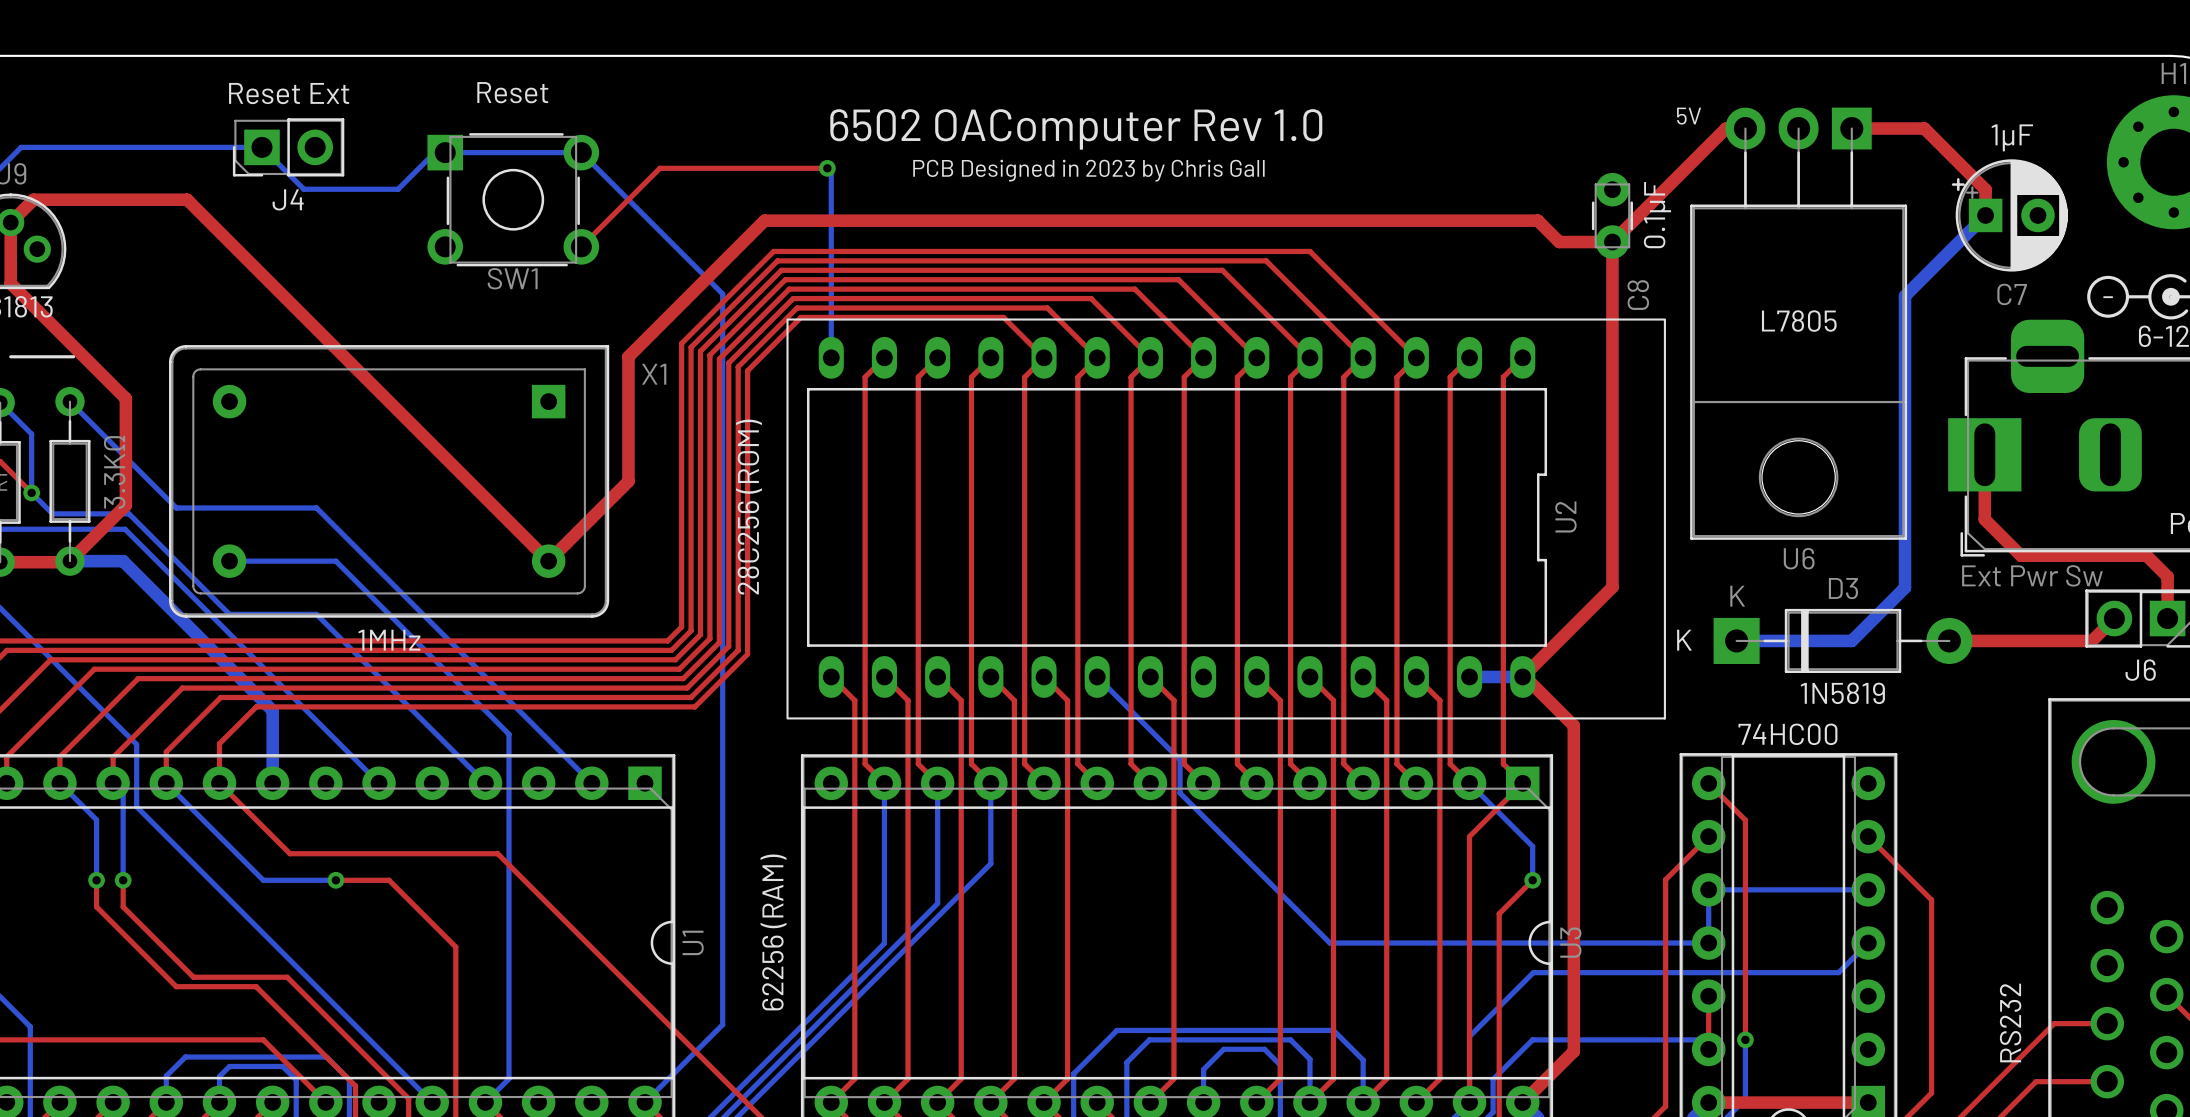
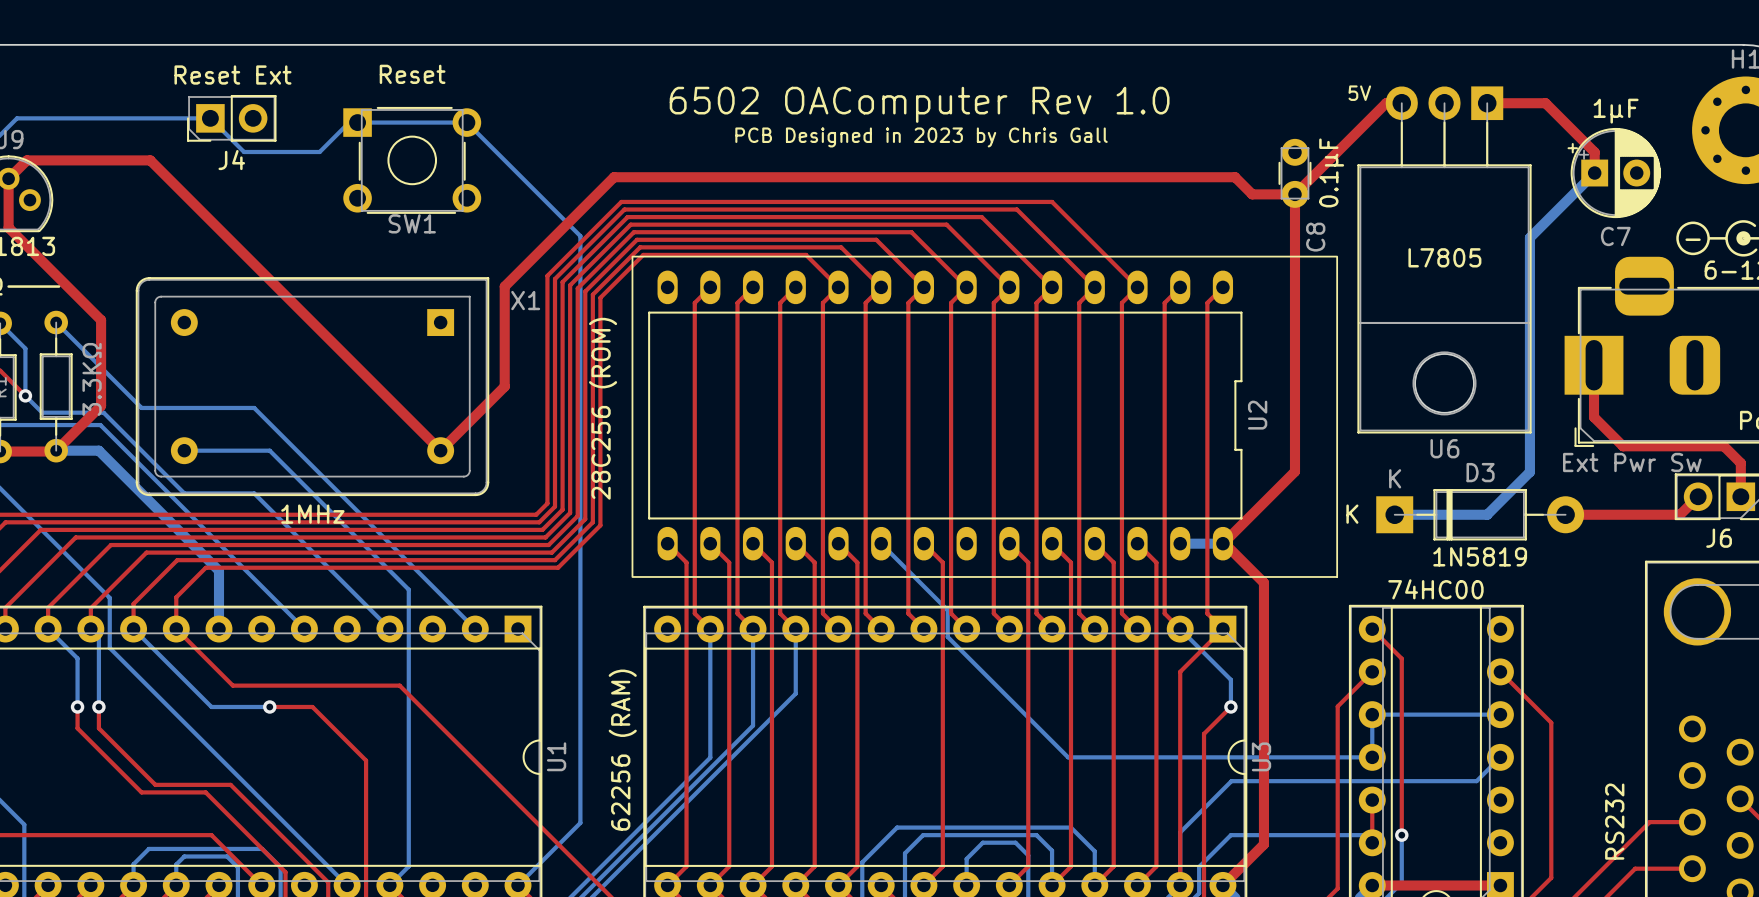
top track: (827, 168) (659, 168) (581, 246) -> none
bottom track: (827, 168) (831, 172) (831, 339) -> none
via: (827, 168) -> none

